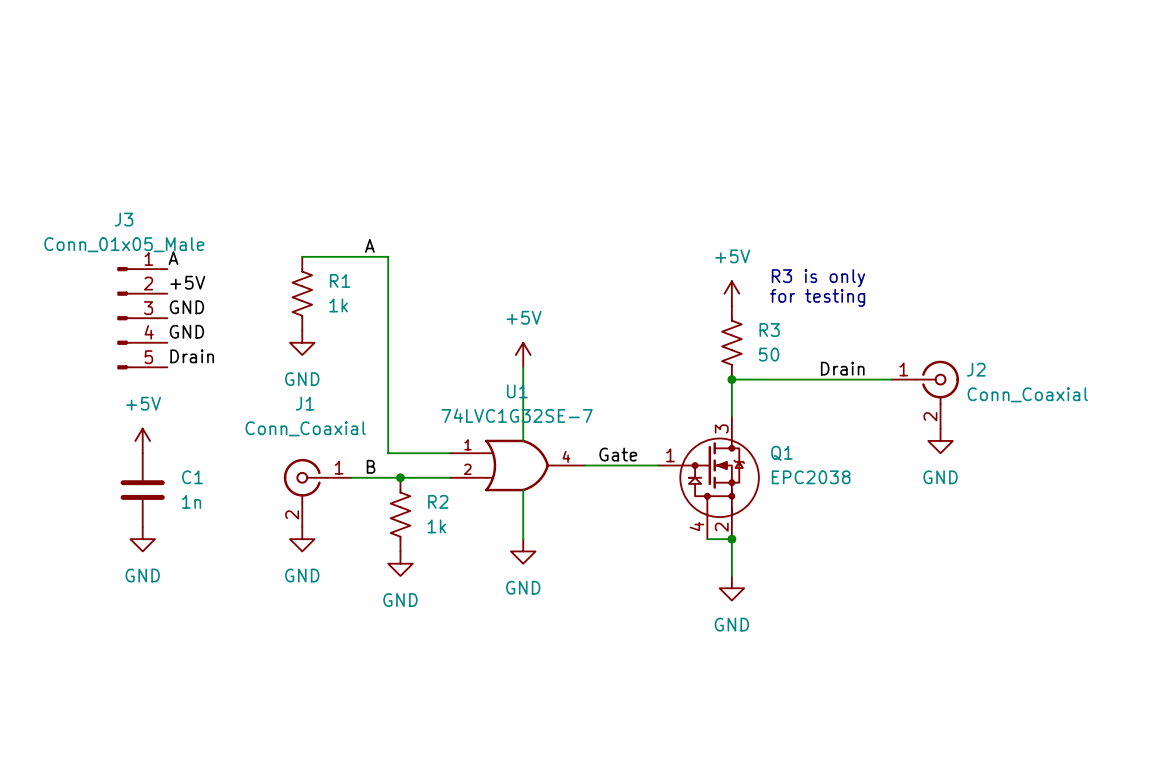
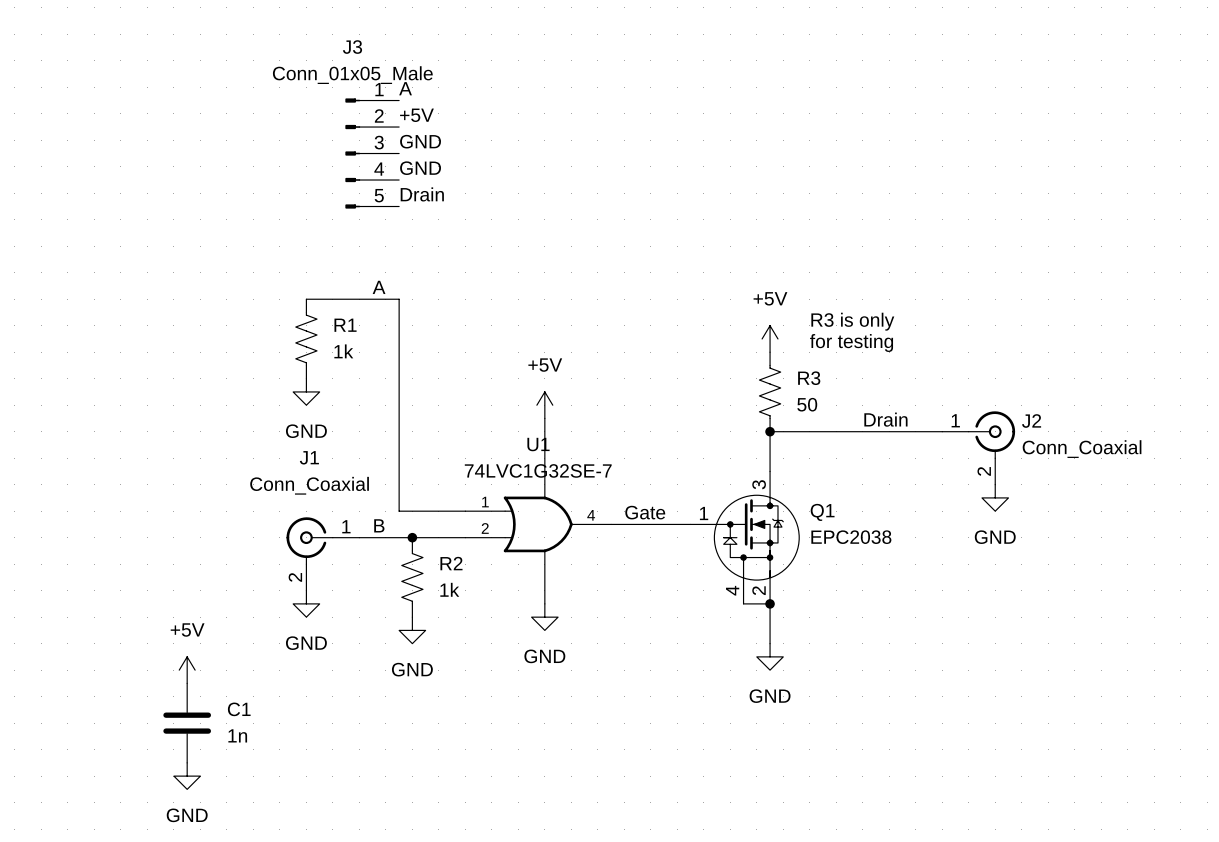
label: none -> A (405, 88)
label: none -> +5V (416, 115)
label: none -> GND (420, 141)
label: none -> GND (420, 168)
label: none -> Drain (422, 194)
label: A (173, 258) -> none
label: +5V (187, 282) -> none
label: GND (186, 307) -> none
J3 position: (142, 318) -> (372, 153)
label: GND (186, 331) -> none
label: Drain (192, 356) -> none
power symbol position: +5V (142, 440) -> +5V (187, 670)
C1 position: (142, 490) -> (187, 723)
power symbol position: GND (142, 539) -> GND (187, 776)

